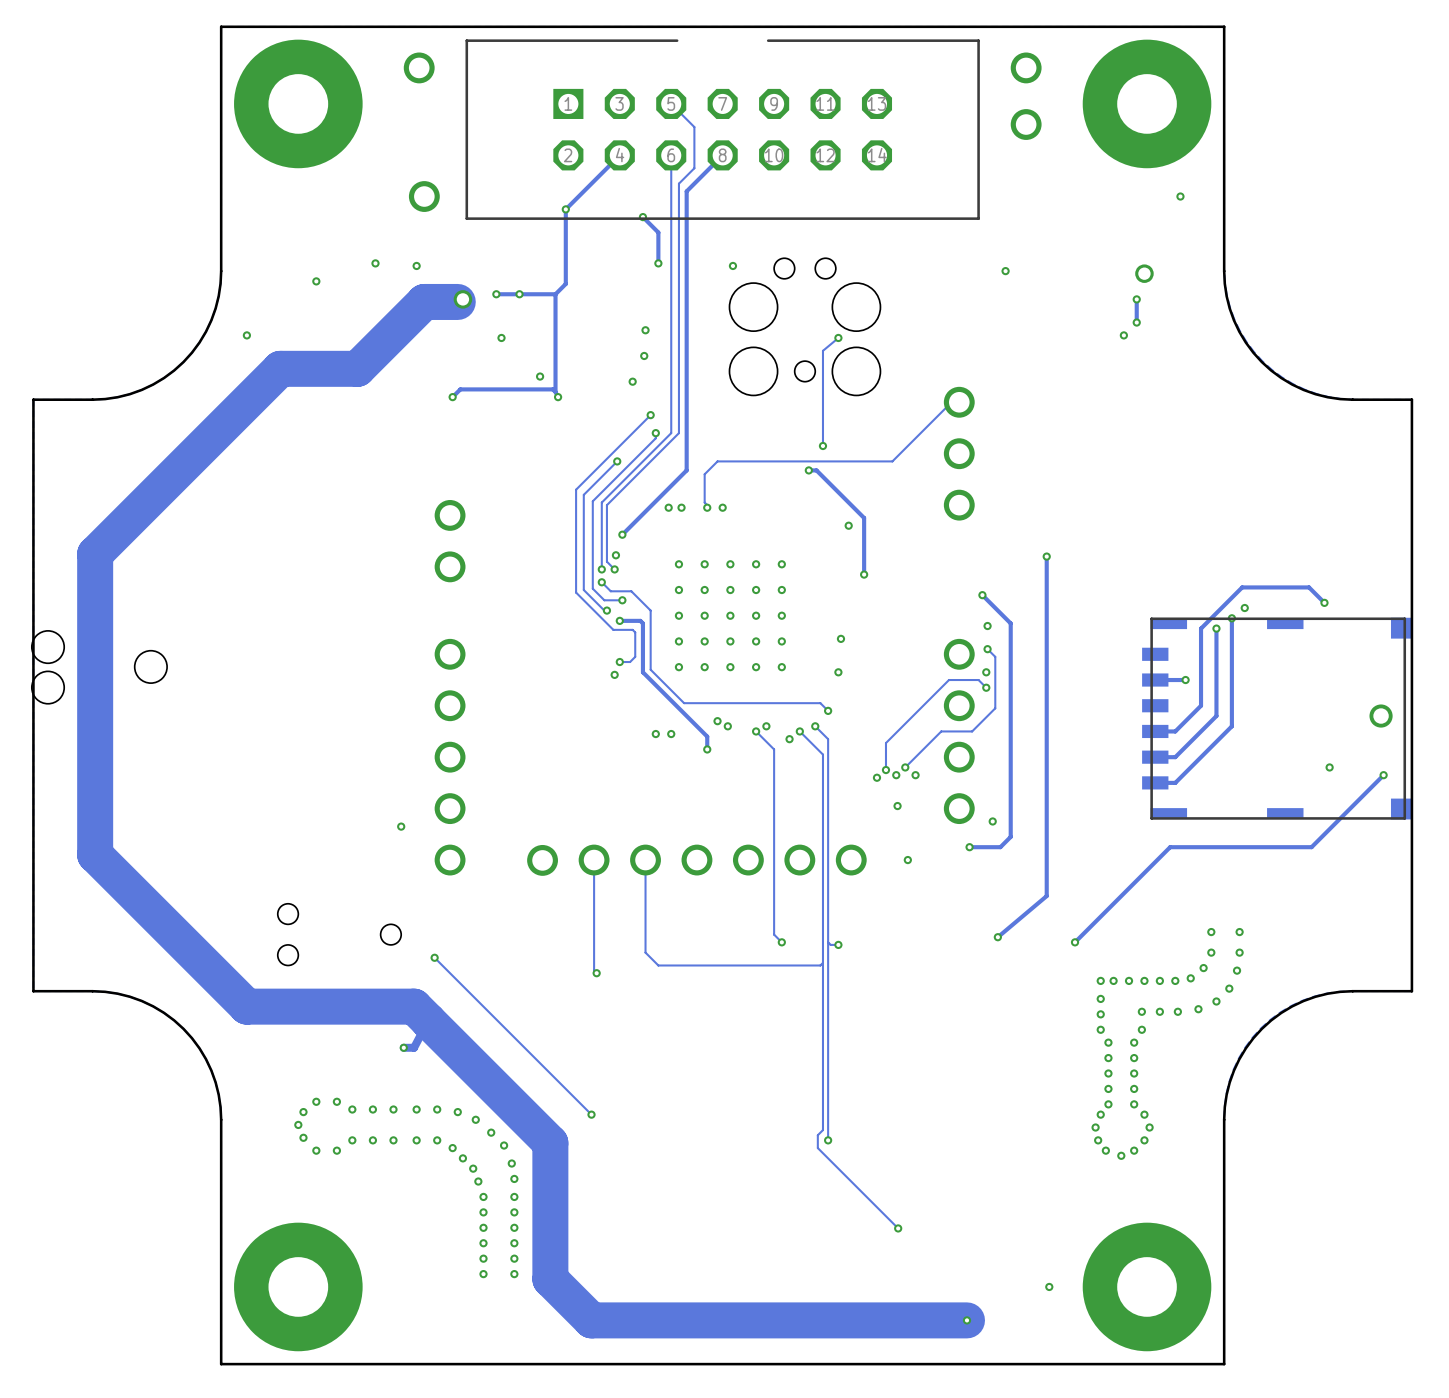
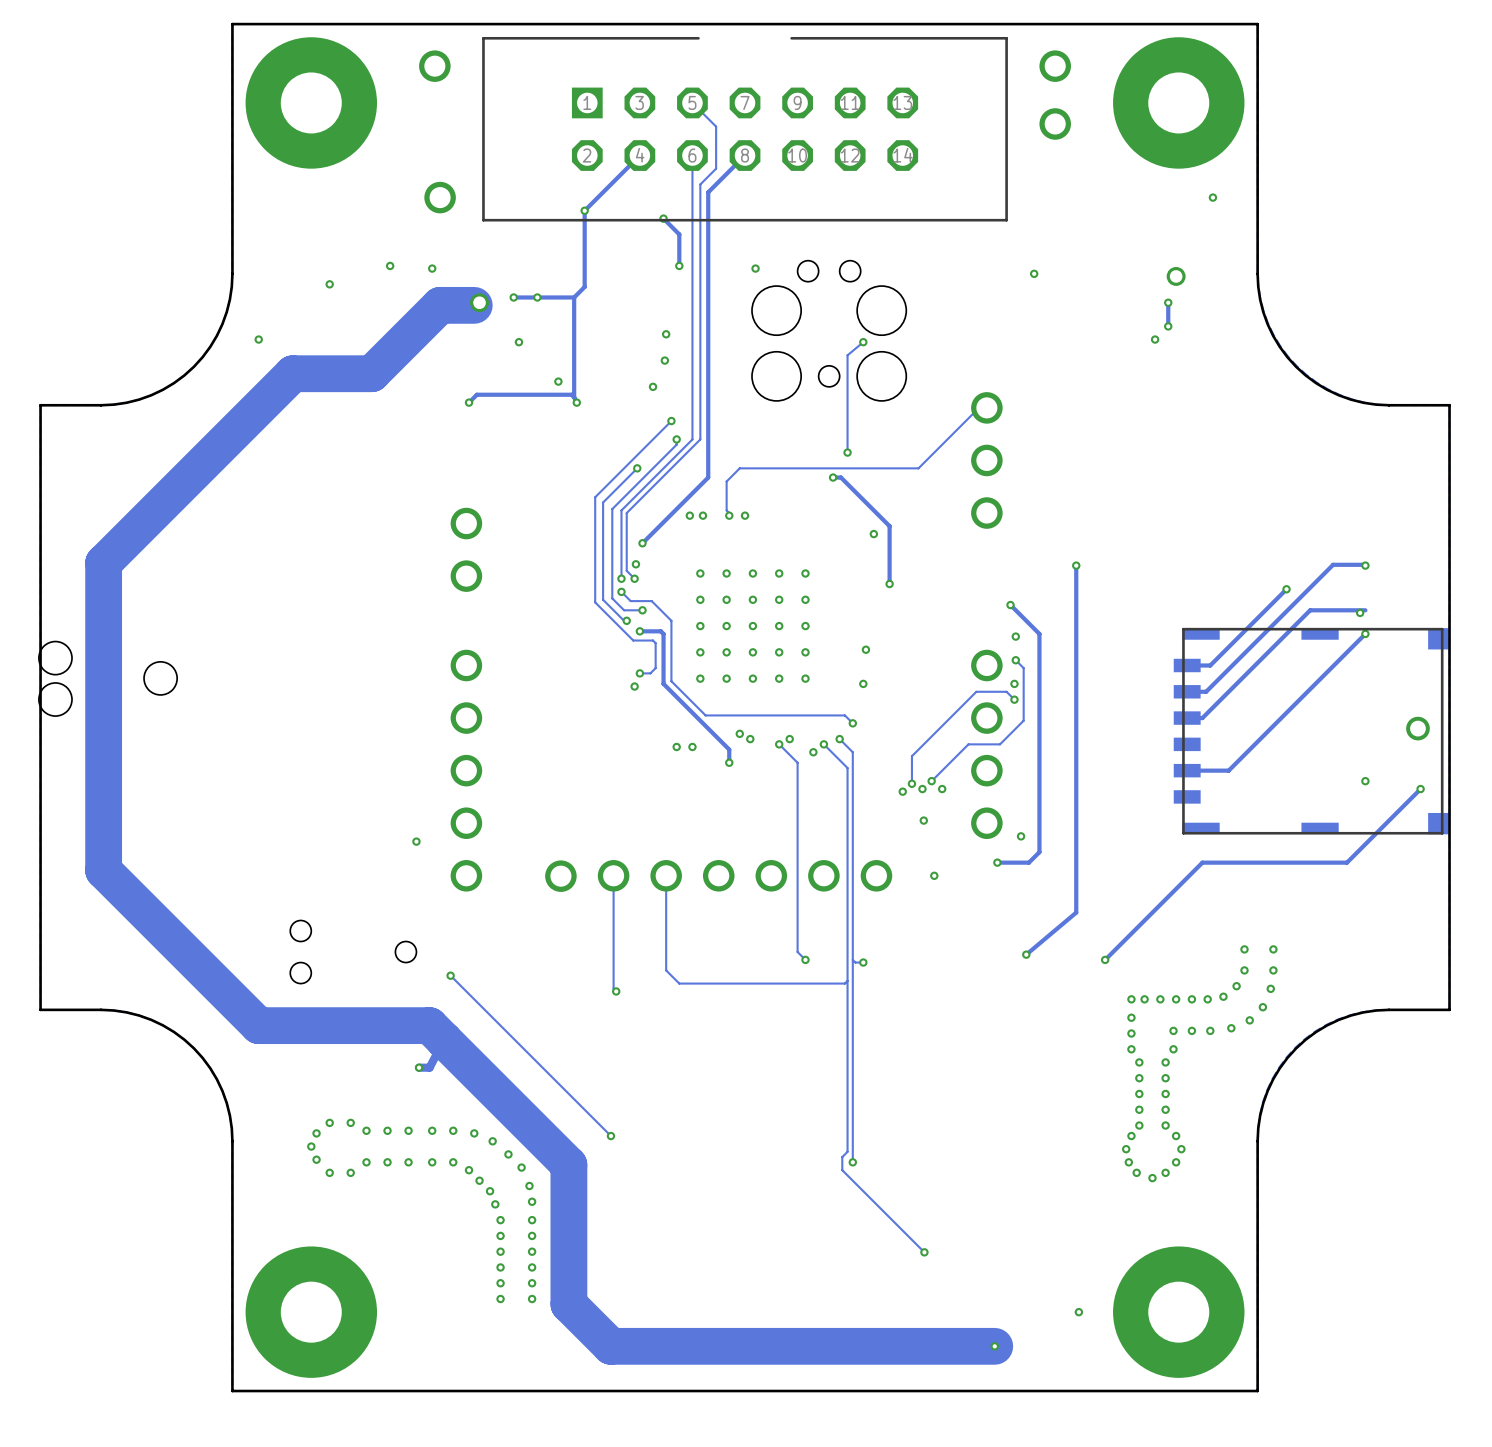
via: none -> (1365, 565)
track: none -> (1286, 589) (1210, 665) (1187, 665)
via: none -> (1286, 589)
track: none -> (1365, 610) (1310, 610) (1202, 718) (1187, 718)
track: (1324, 602) (1309, 587) (1242, 587) (1201, 628) (1201, 705) (1175, 731) (1155, 731) -> none
via: (1244, 608) -> none
track: (1231, 618) (1231, 726) (1175, 782) (1155, 782) -> none
via: (1231, 618) -> none
via: none -> (1365, 633)
track: (1216, 628) (1216, 716) (1175, 757) -> (1365, 633) (1228, 770) (1207, 770)
via: (1216, 628) -> none
track: (1185, 680) (1173, 680) -> (1365, 565) (1333, 564) (1206, 691)
via: (1185, 680) -> none

